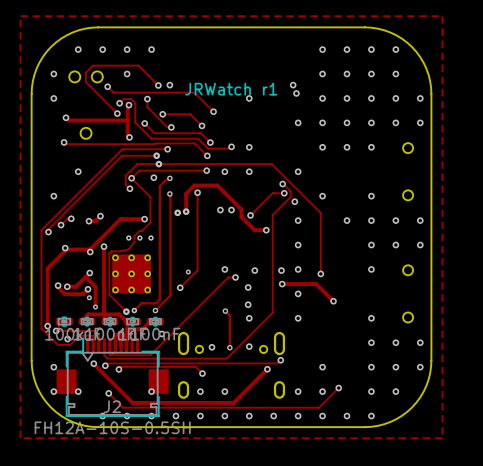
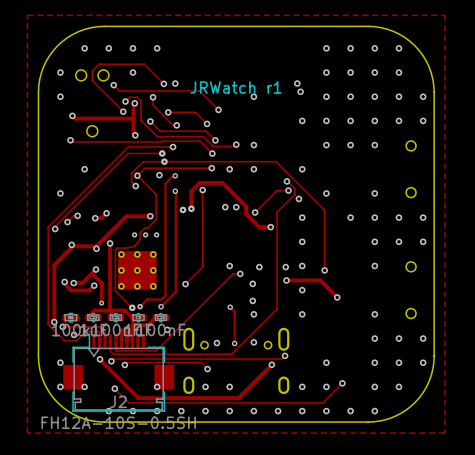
via: (188, 272) -> none
via: (89, 297) -> none

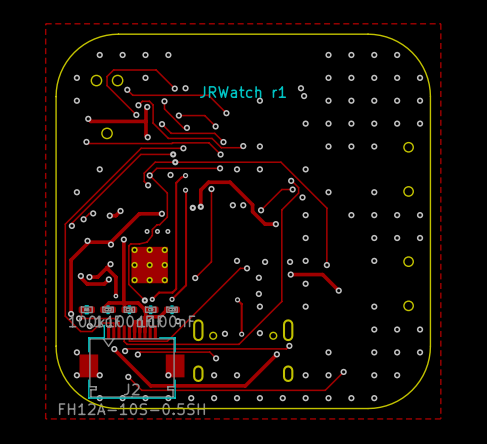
via: none -> (420, 77)
via: none -> (99, 398)

